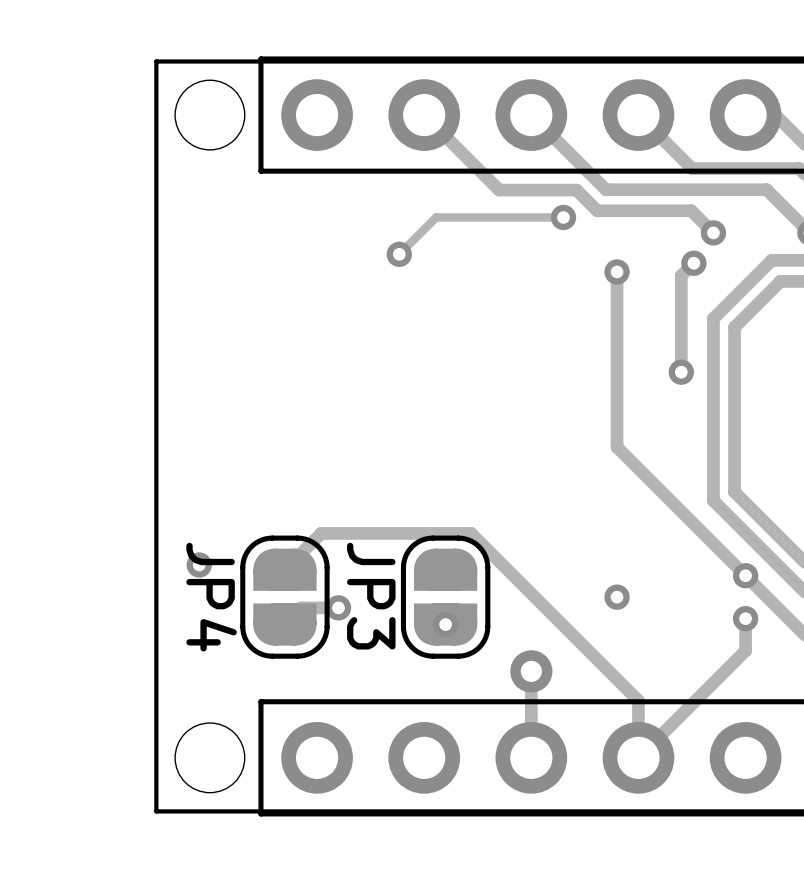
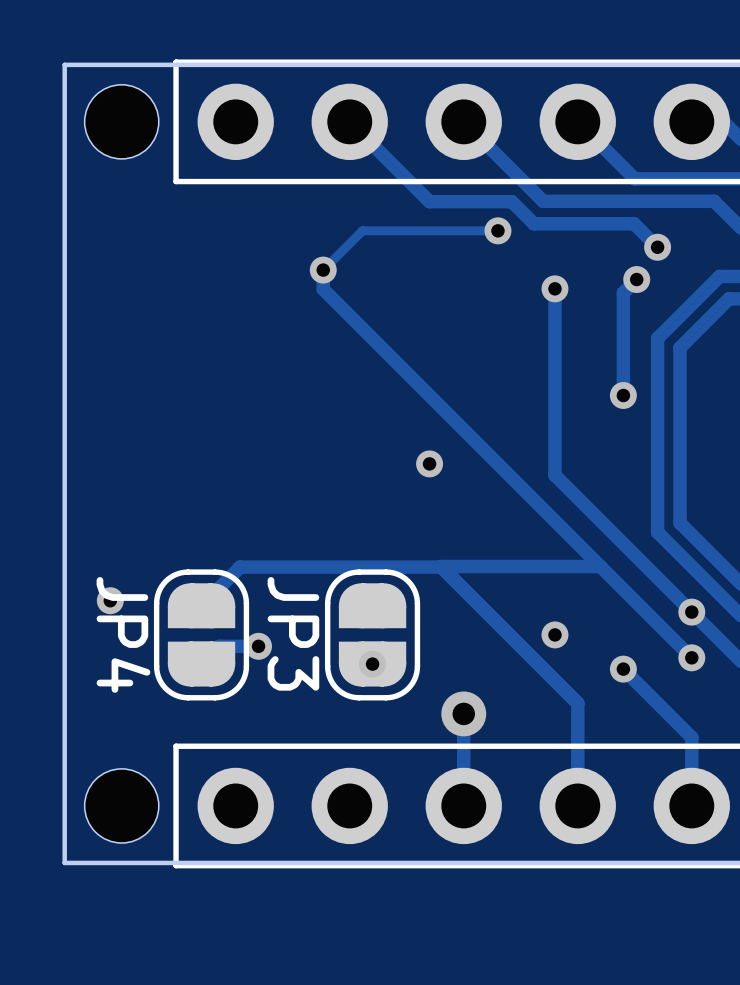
via: none -> (429, 463)
track: (471, 533) (638, 700) -> (600, 566) (440, 566) (577, 703) (577, 745)
track: none -> (441, 567) (399, 567)
track: (745, 618) (745, 650) (638, 757) -> (691, 657) (323, 289) (323, 270)
track: none -> (623, 669) (691, 737) (691, 805)
via: none -> (623, 669)

